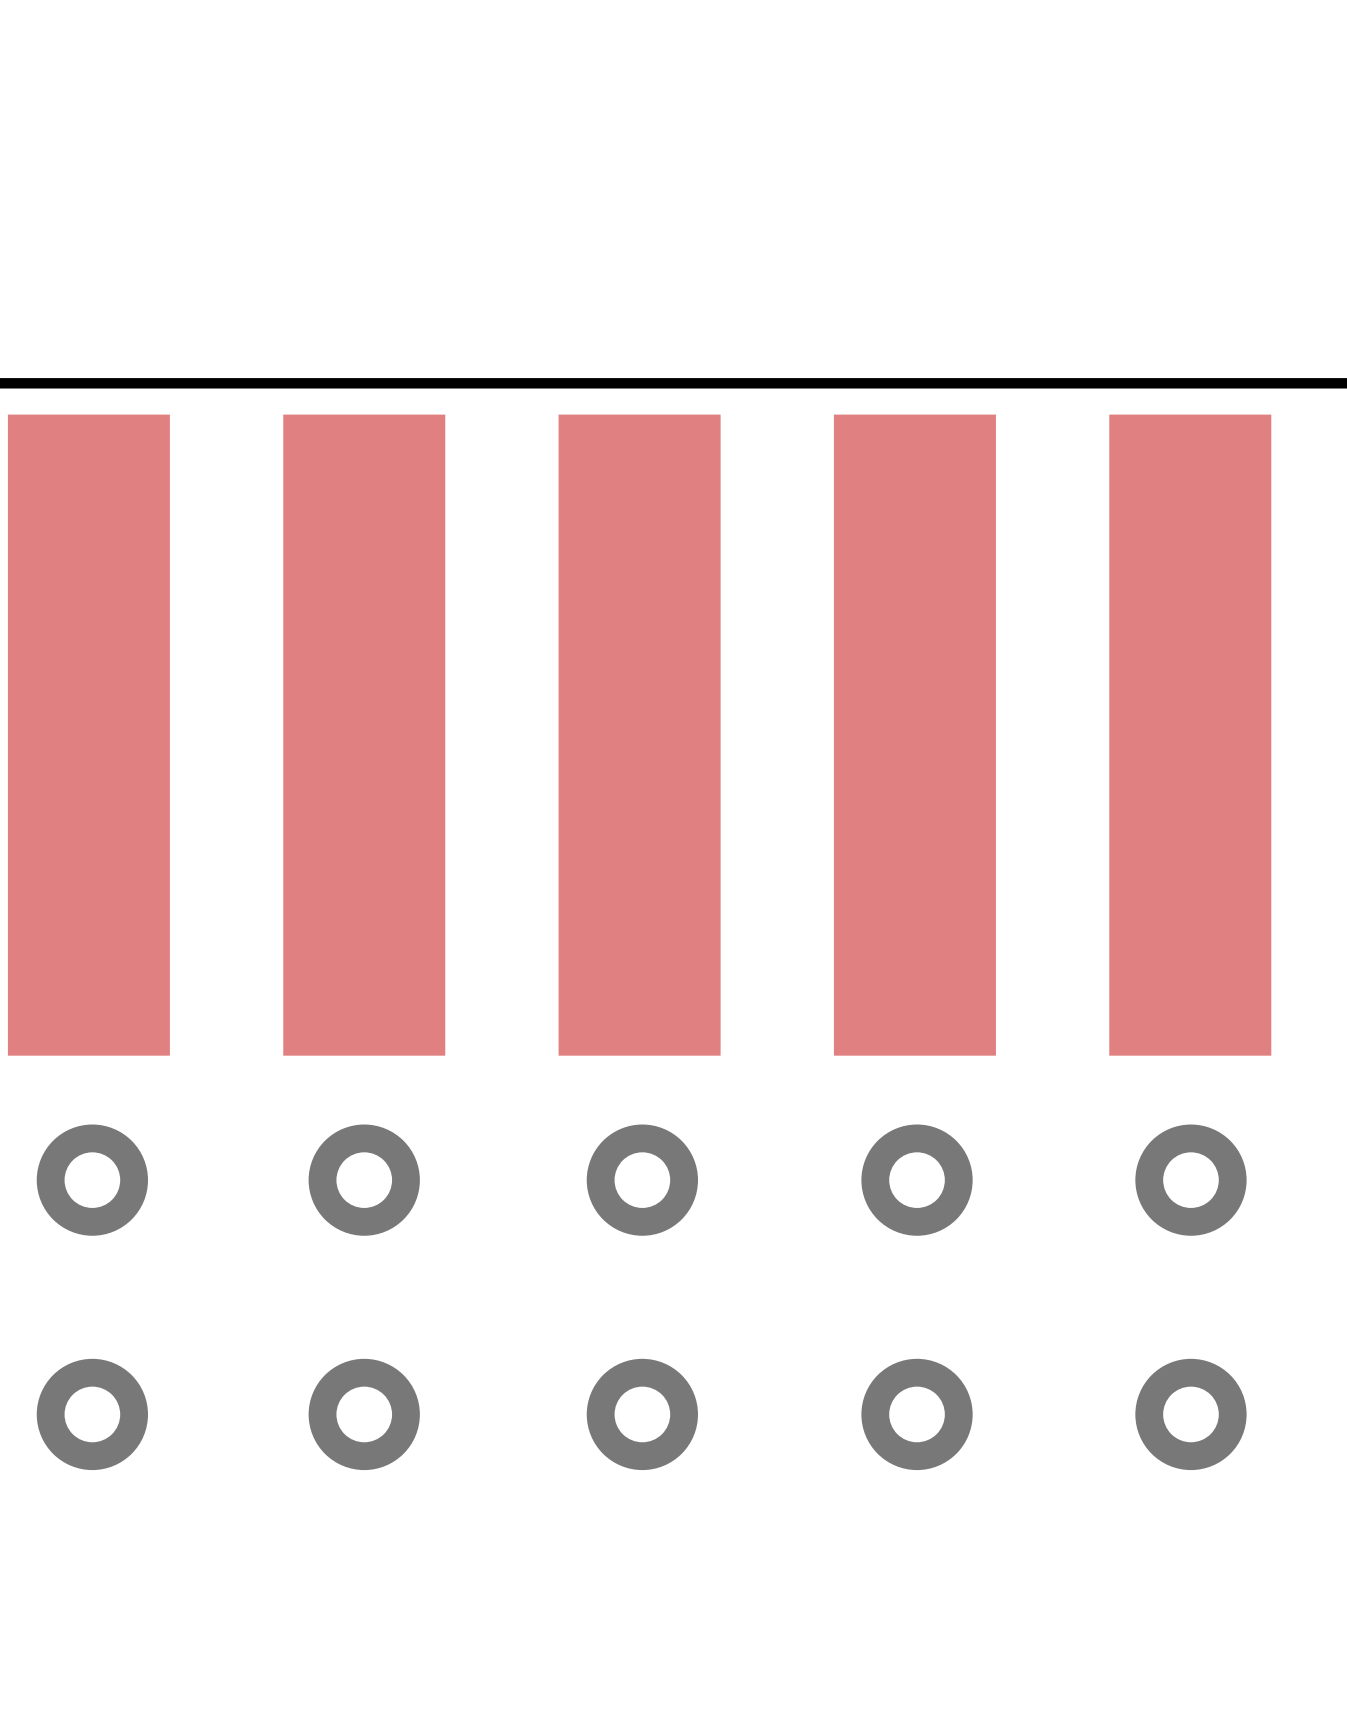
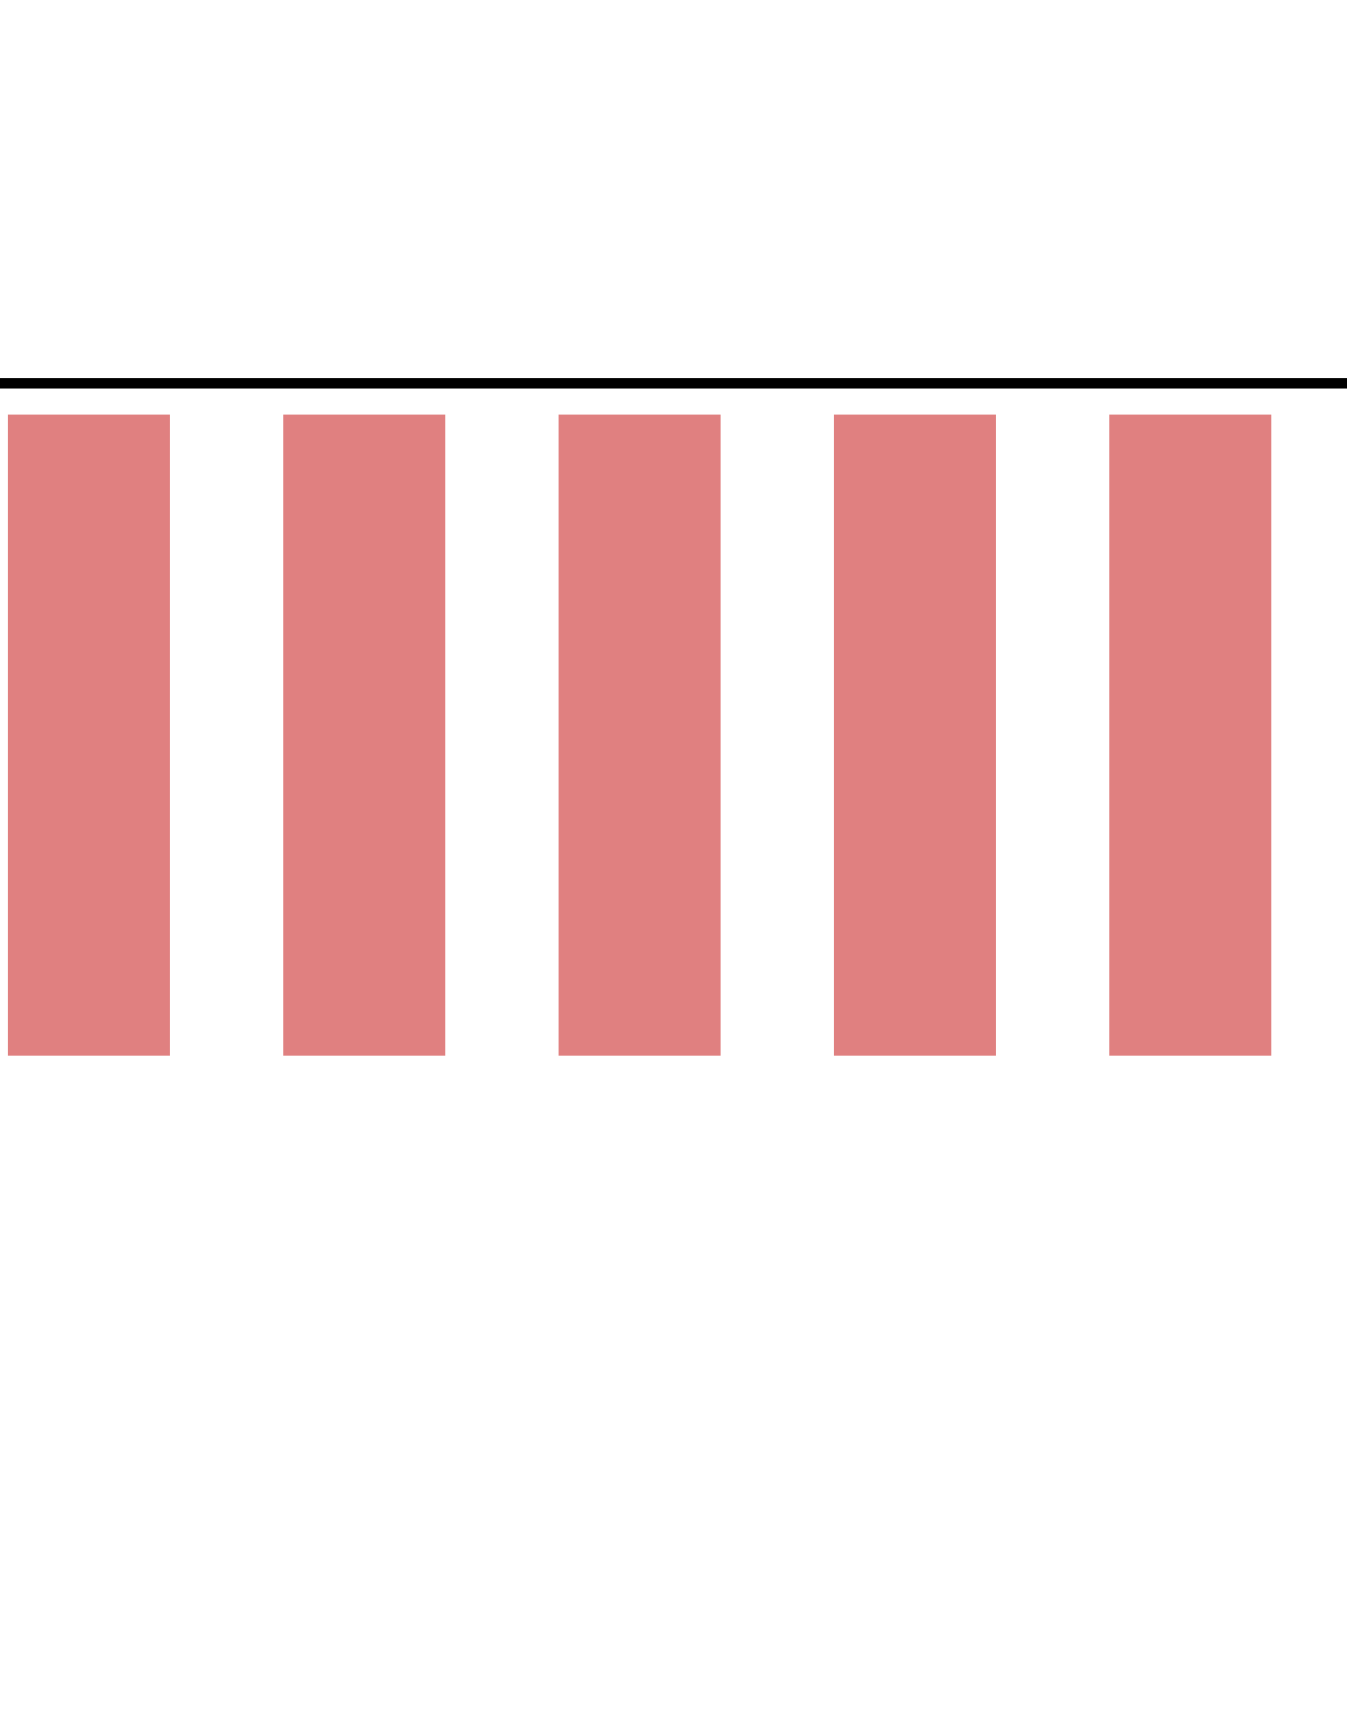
via: (92, 1180) -> none
via: (364, 1180) -> none
via: (642, 1180) -> none
via: (917, 1180) -> none
via: (1190, 1180) -> none
via: (92, 1414) -> none
via: (364, 1414) -> none
via: (642, 1414) -> none
via: (917, 1414) -> none
via: (1190, 1414) -> none

